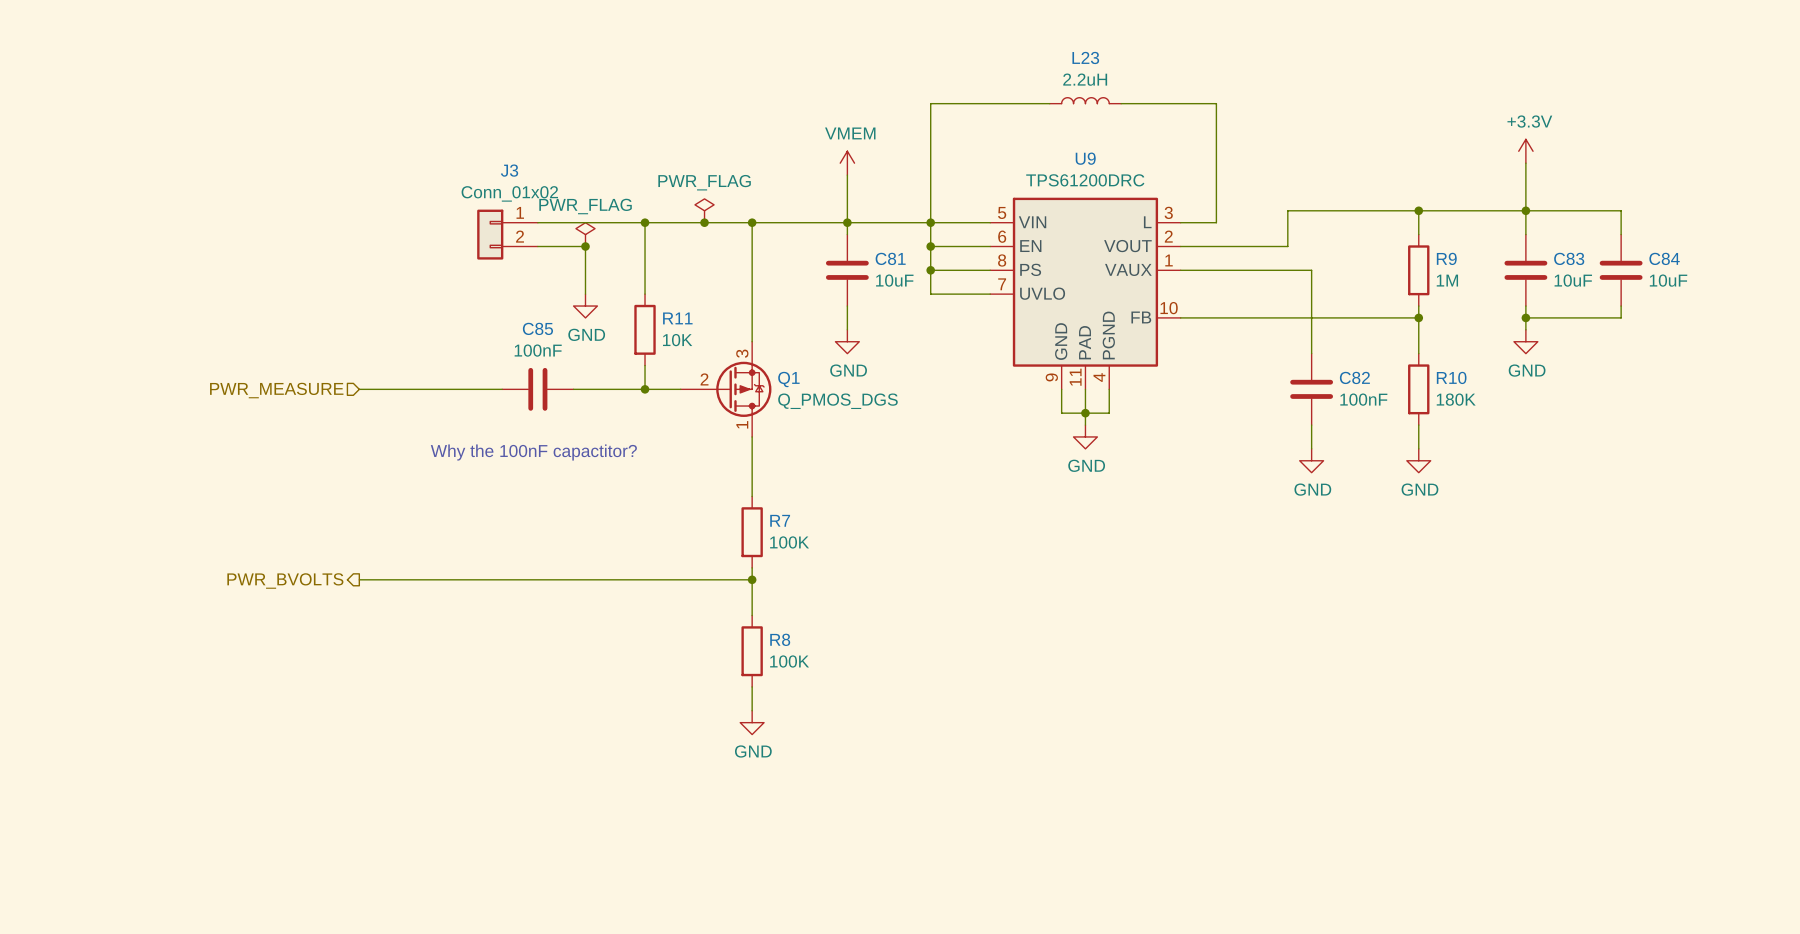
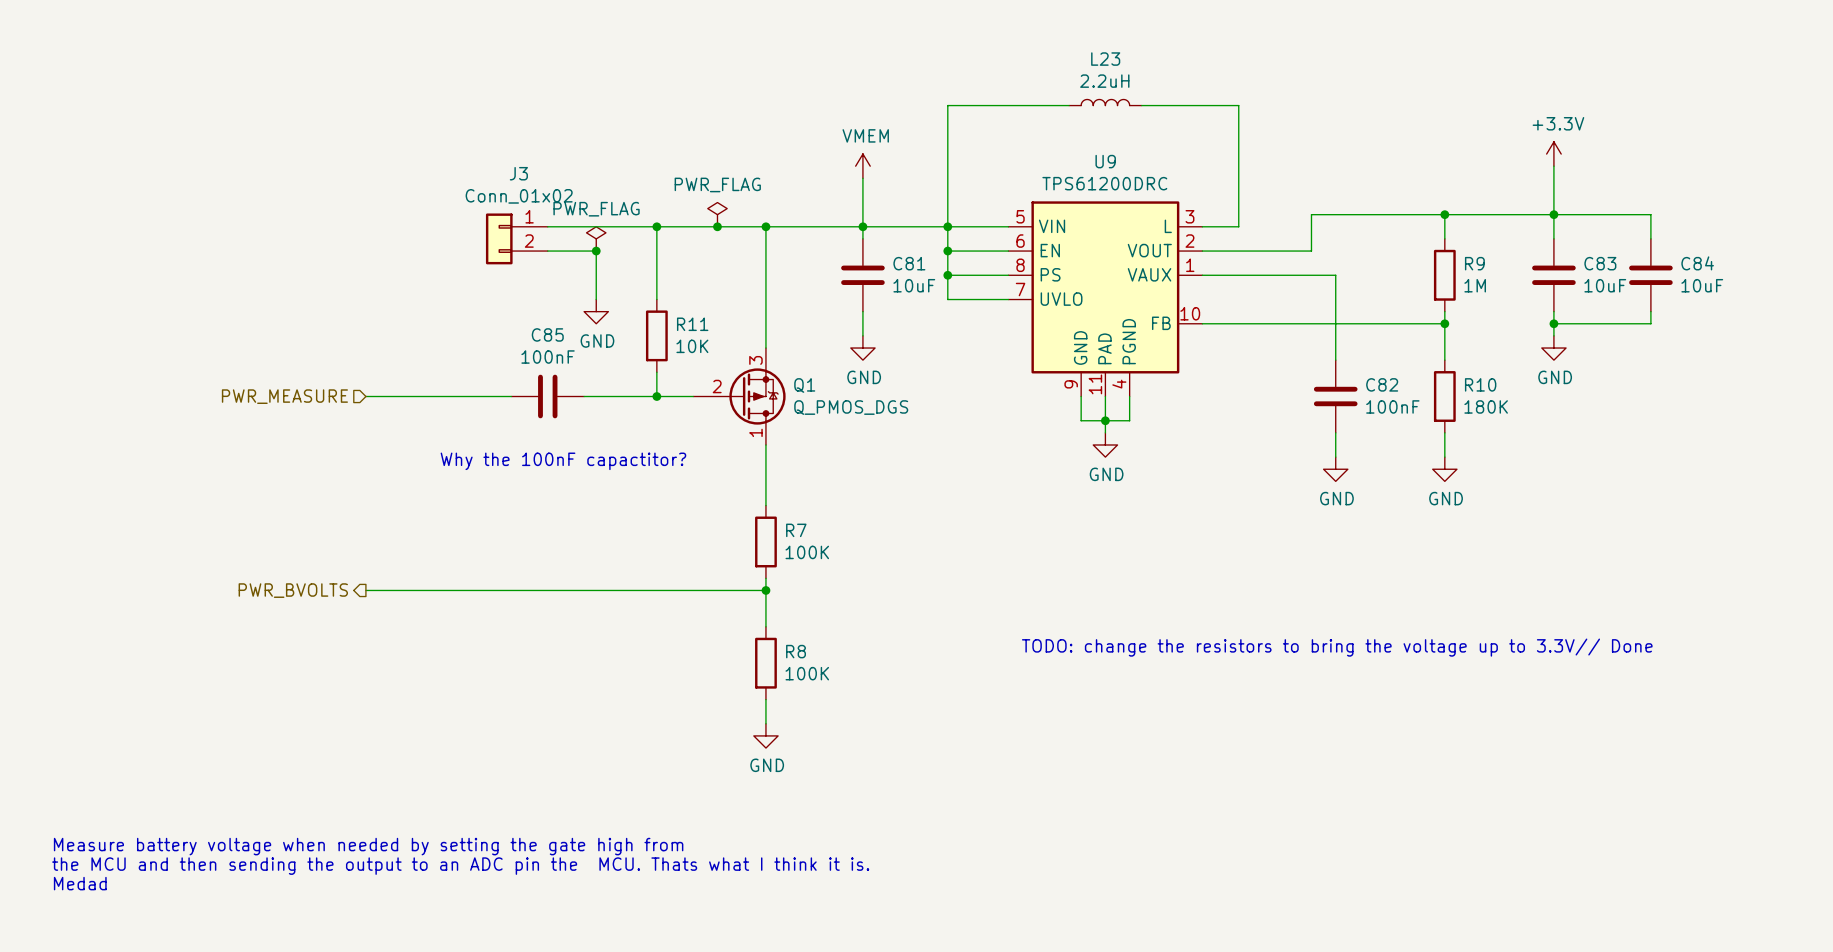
text: none -> TODO: change the resistors to bring the voltage up to 3.3V// Done (1337, 647)
text: none -> Measure battery voltage when needed by setting the gate high from (368, 846)
text: none -> the MCU and then sending the output to an ADC pin the MCU. Thats what I think it is. (460, 866)
text: none -> Medad (80, 883)

